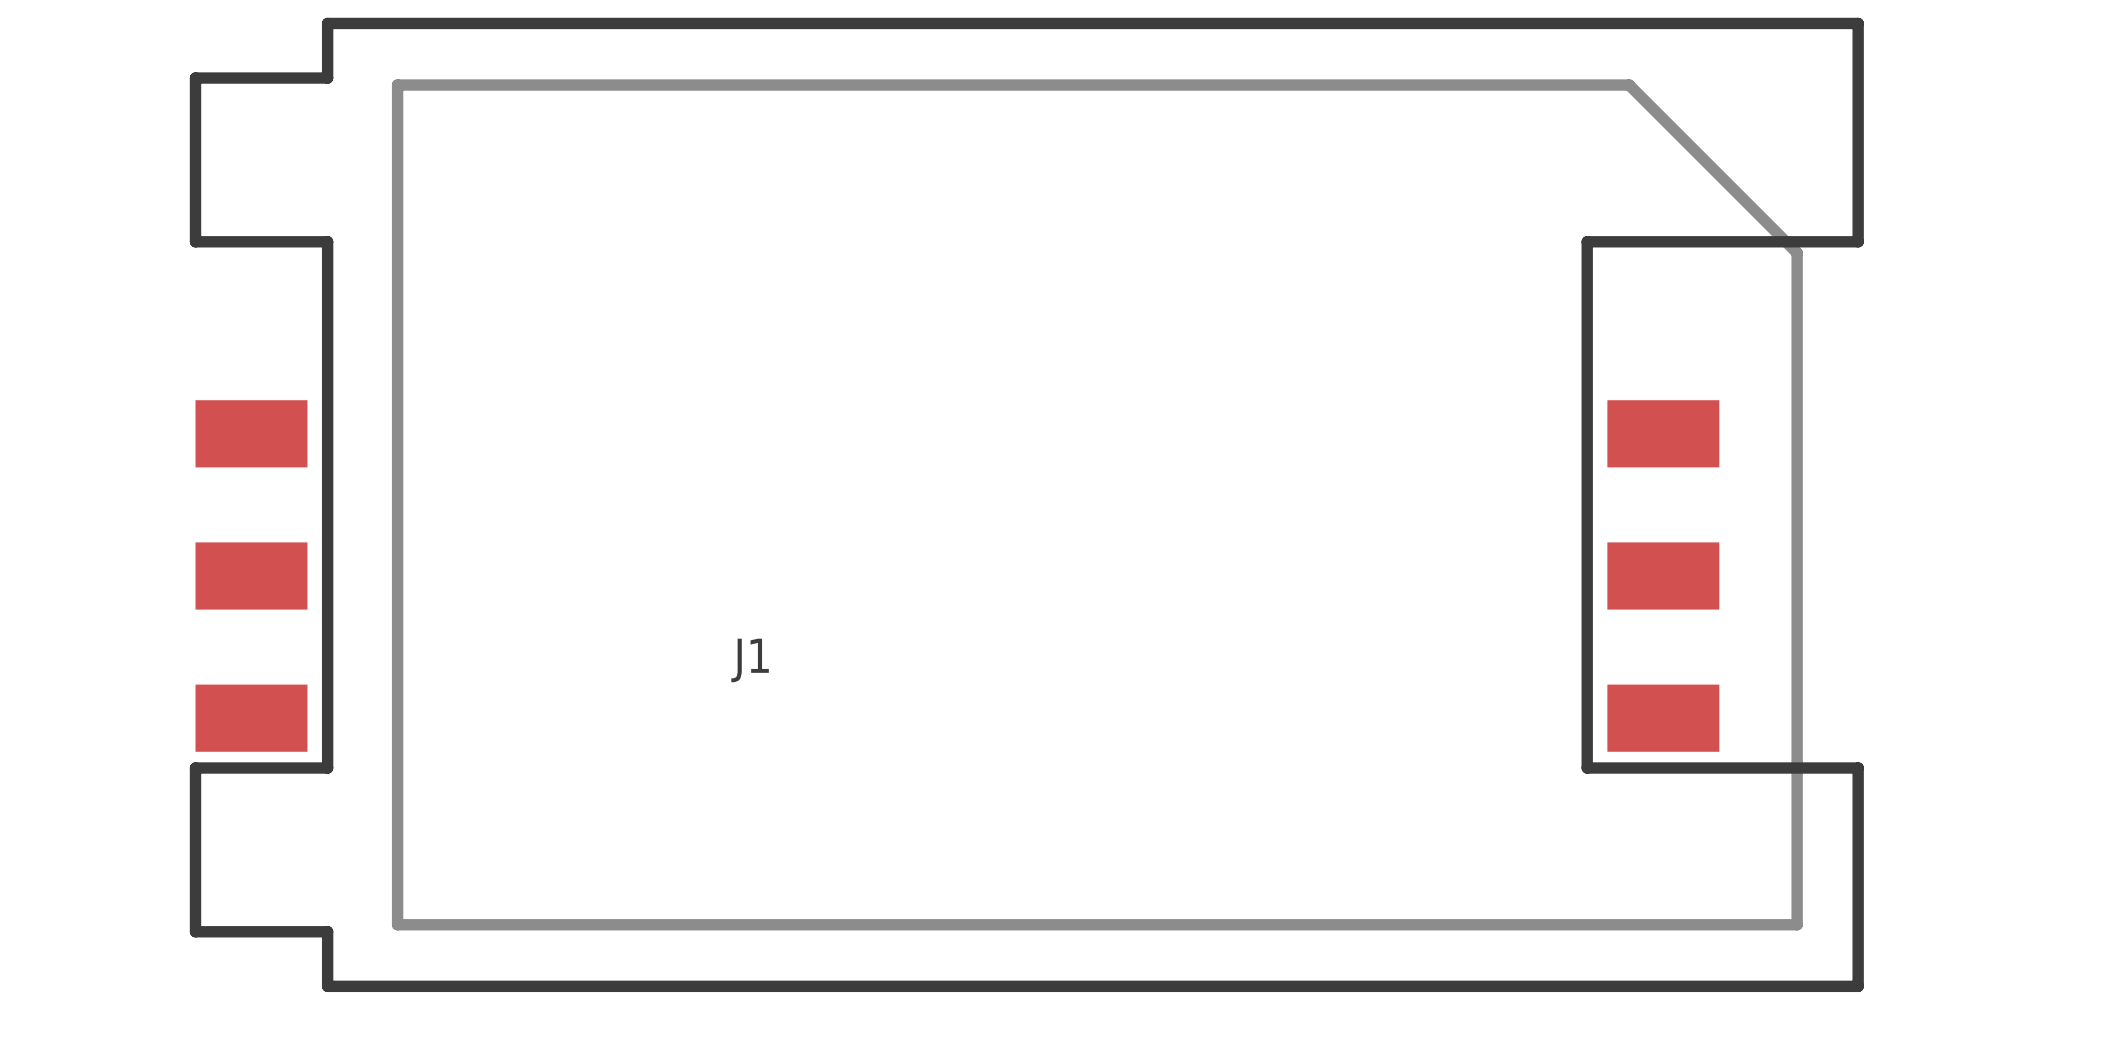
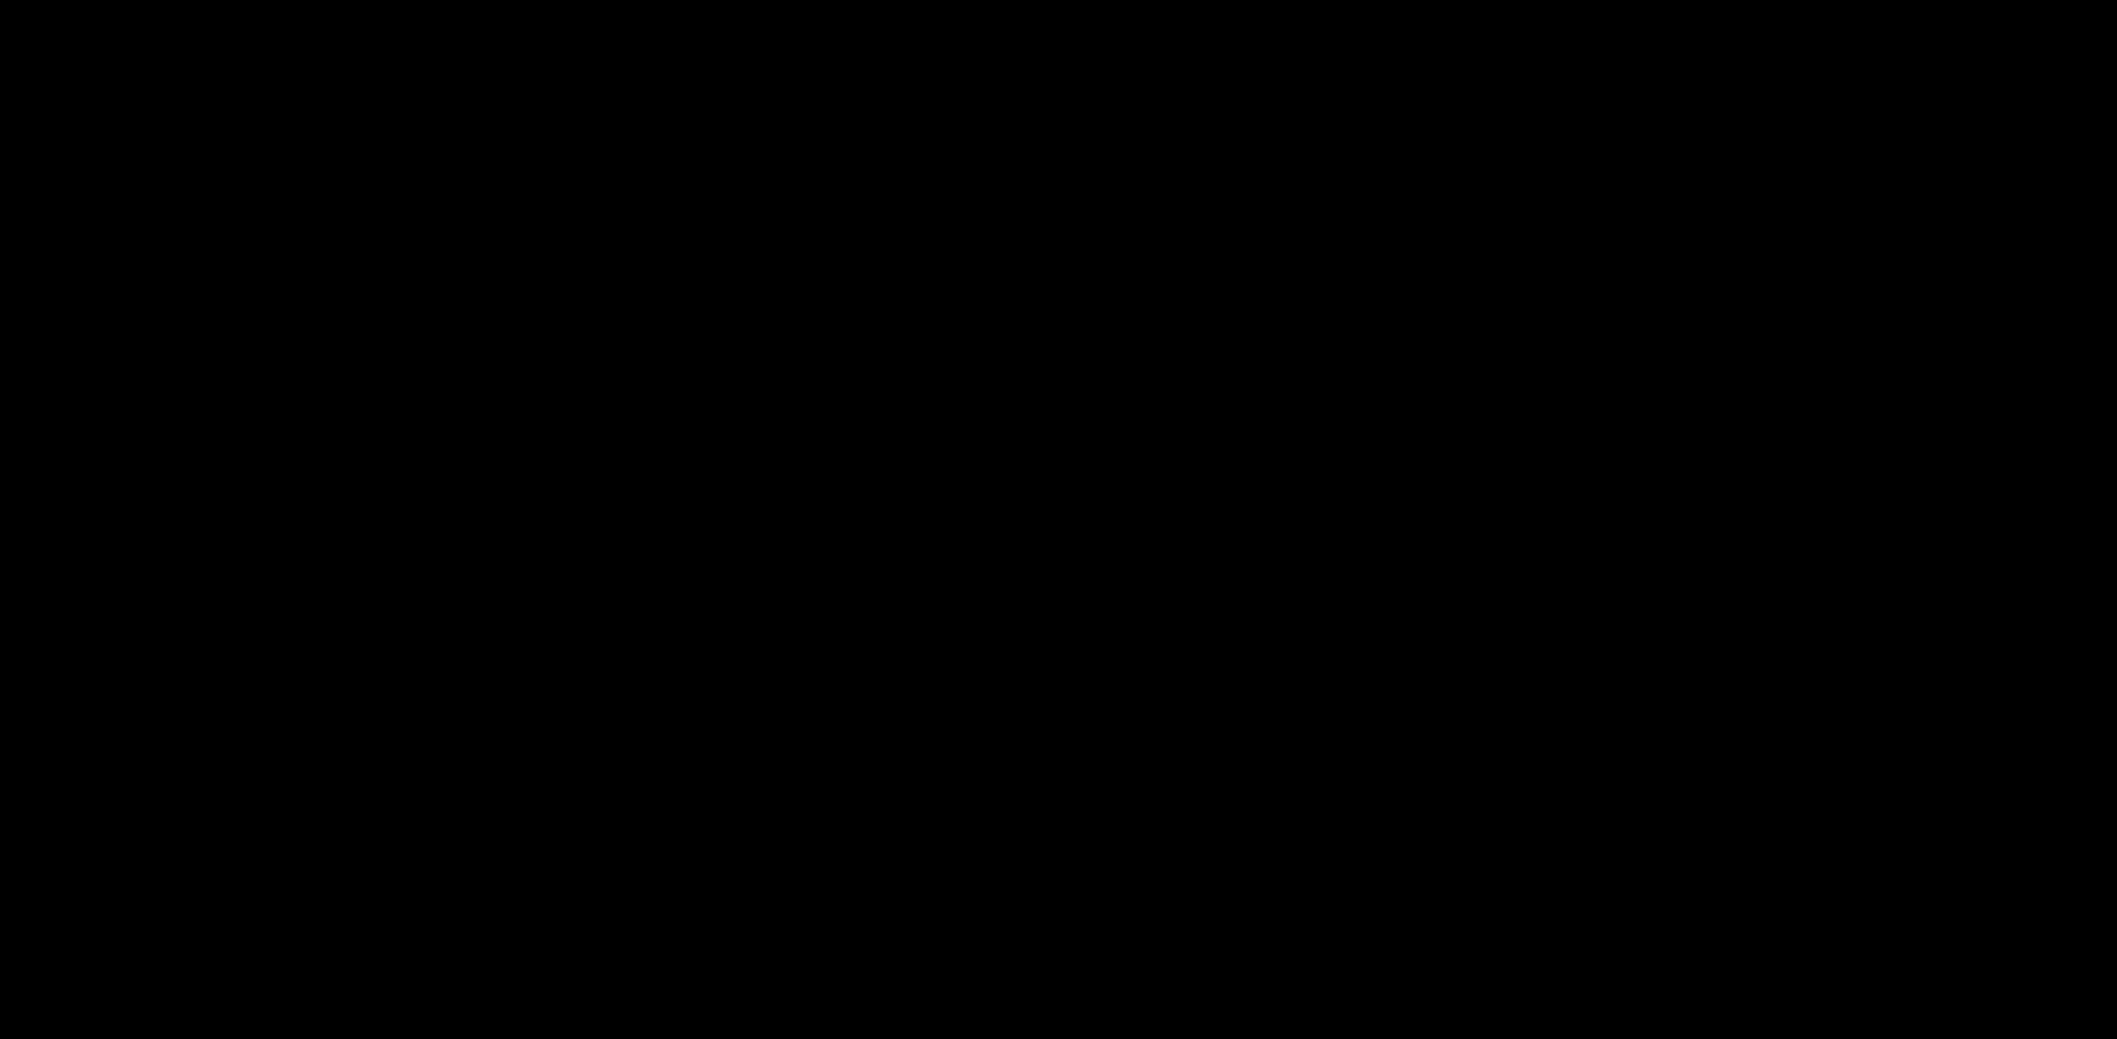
J1: (1026, 504) -> none

